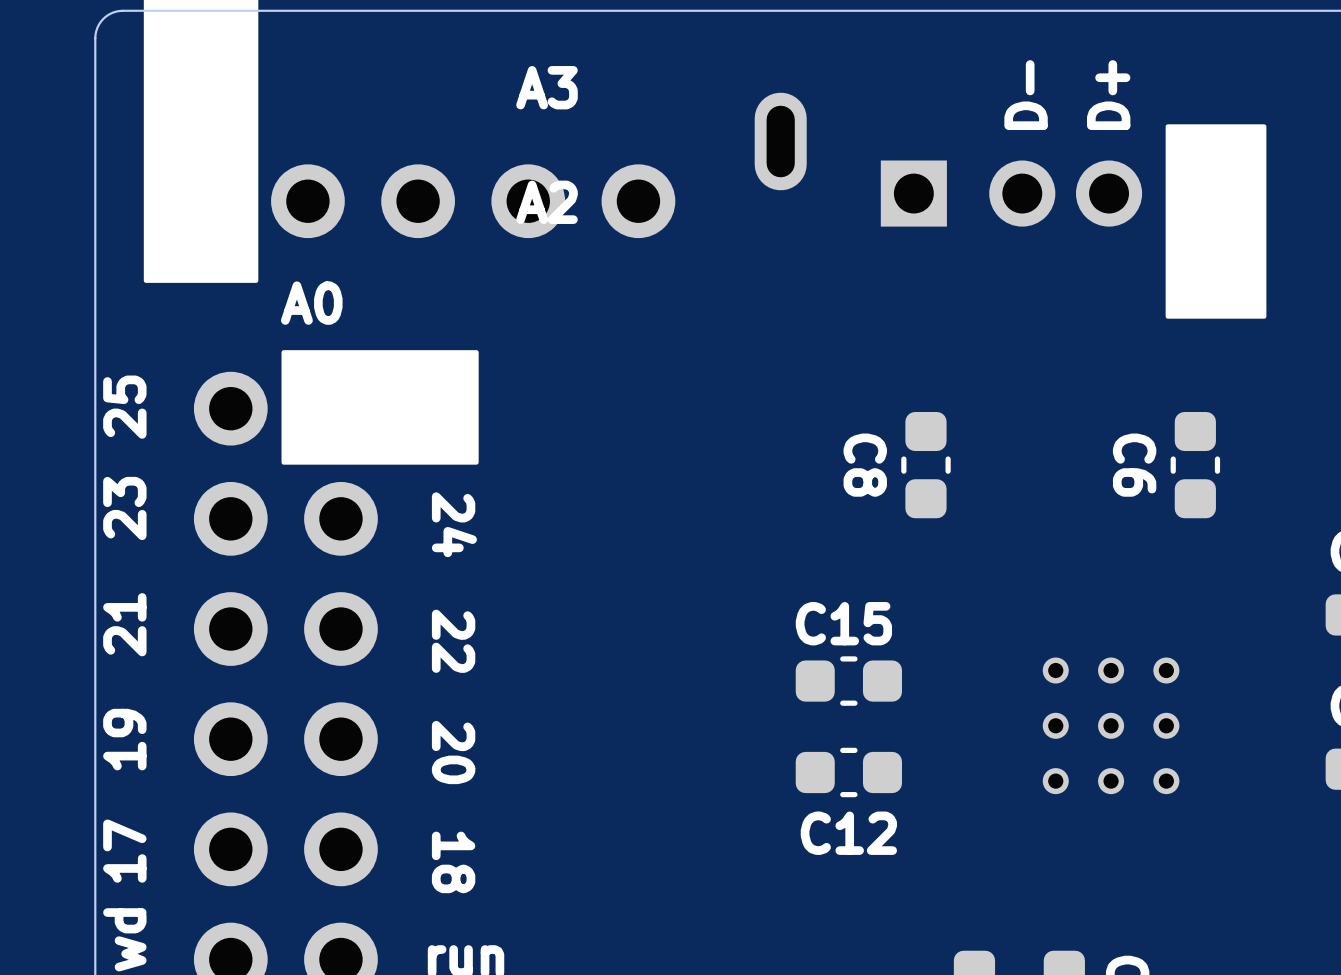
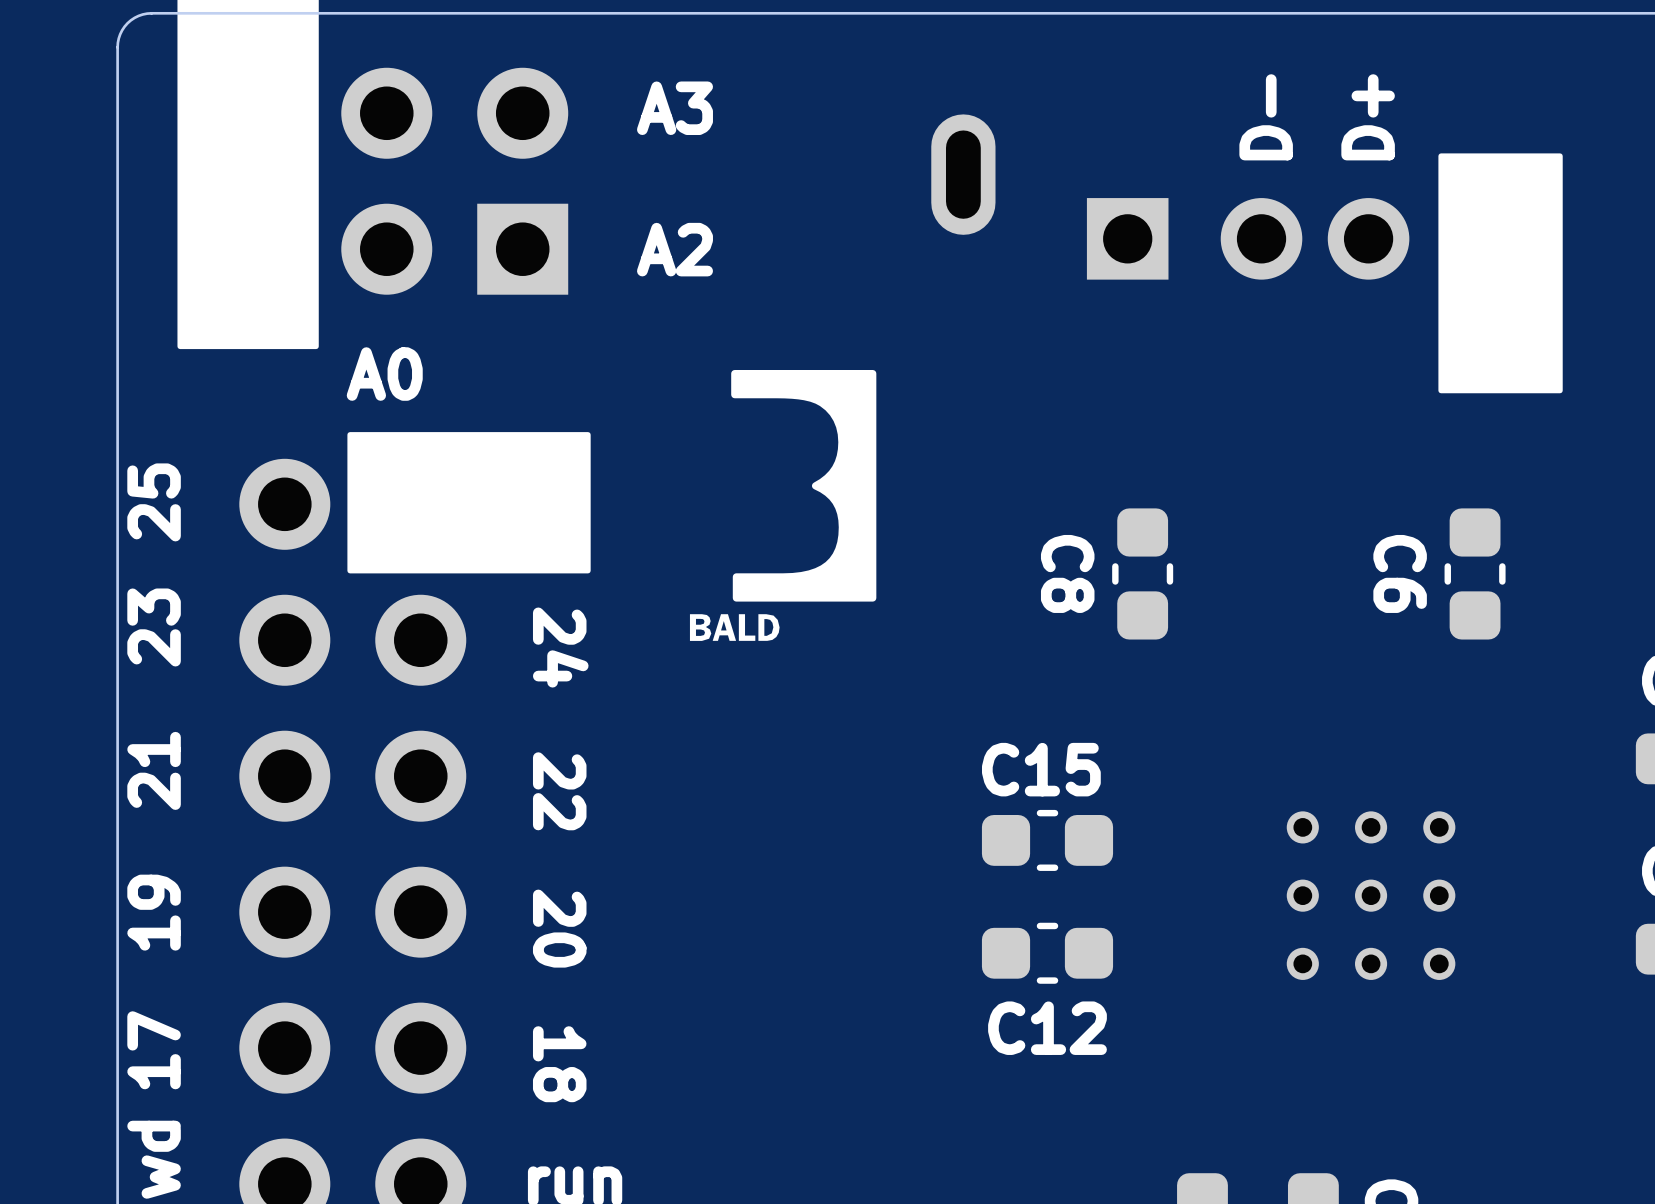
part: none -> (386, 181)
part: (418, 201) -> none
drawing: none -> [689, 369, 877, 641]

